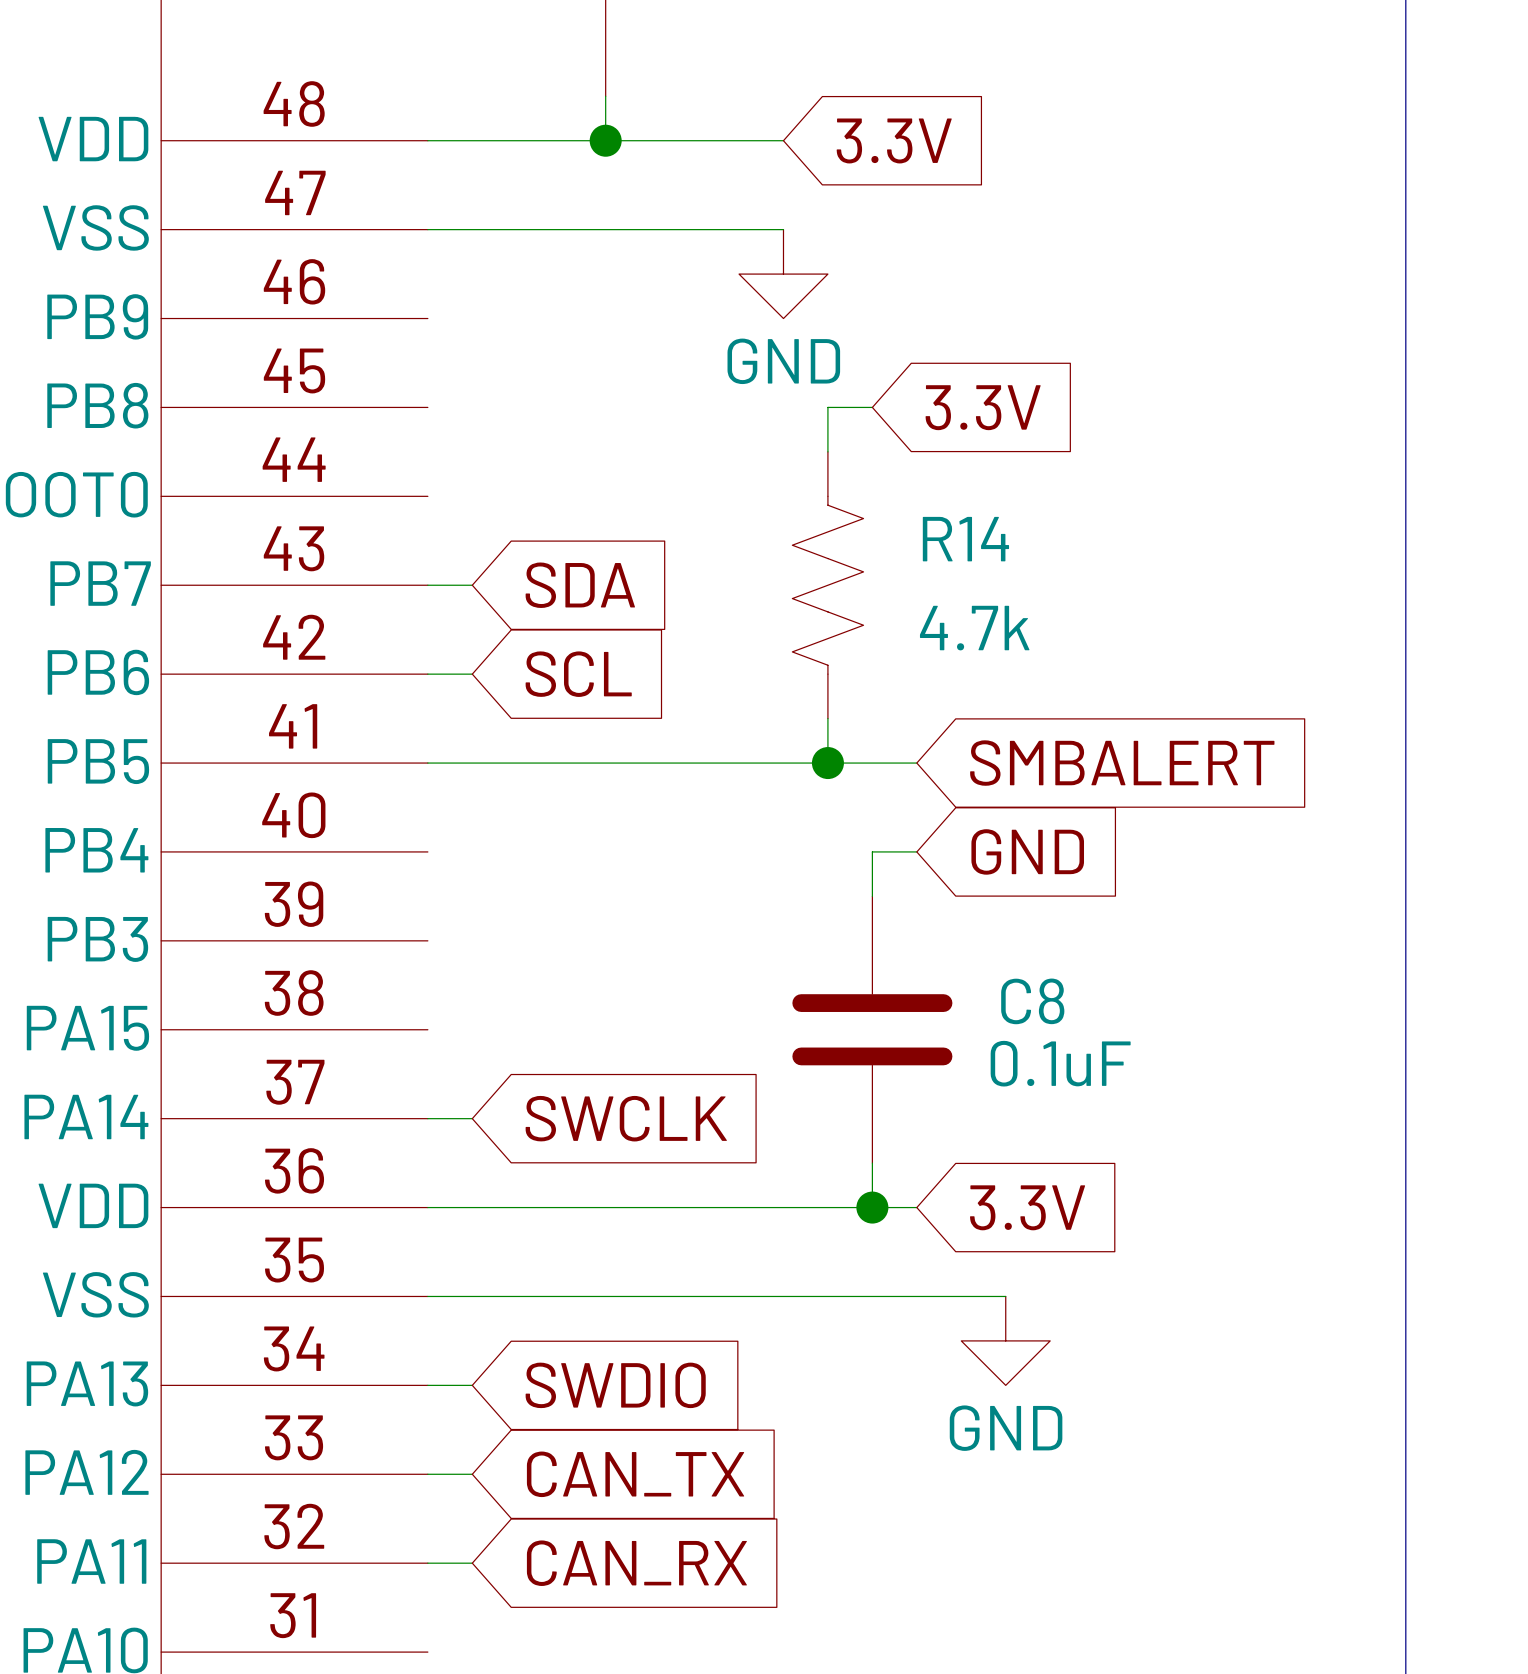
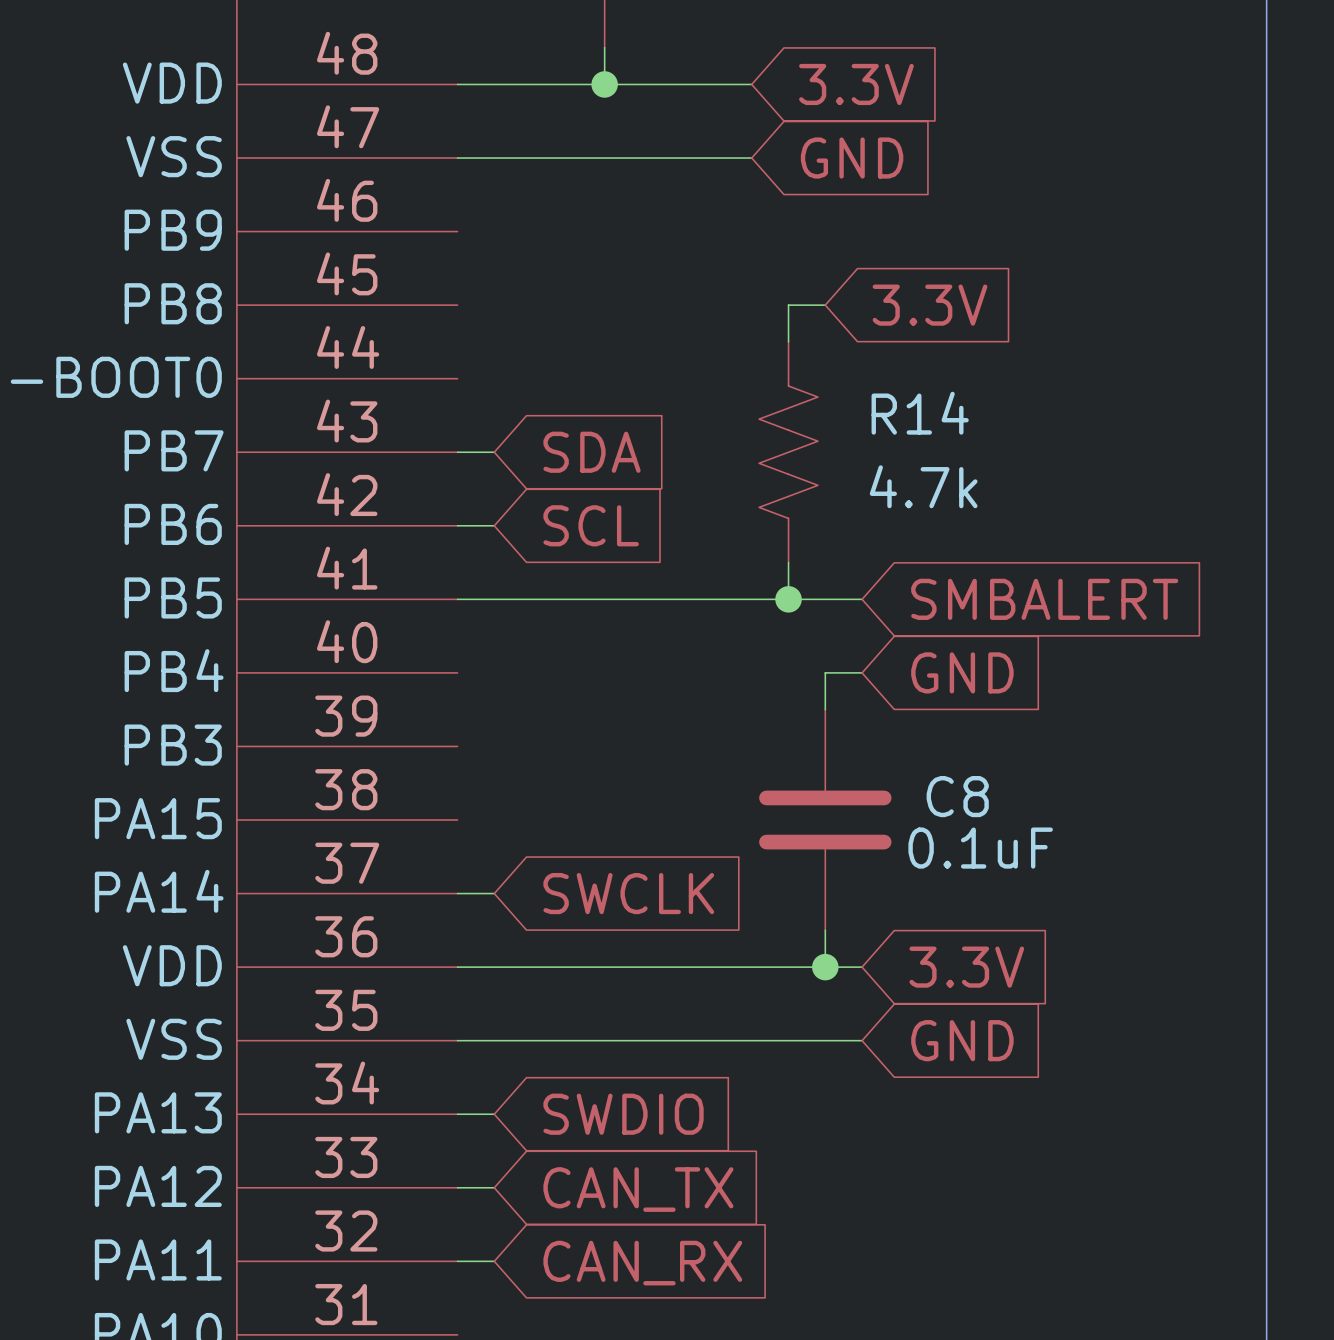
global label: none -> GND (852, 158)
power symbol: GND (783, 274) -> none
wire: (916, 1296) (1005, 1296) -> none
global label: none -> GND (962, 1040)
power symbol: GND (1005, 1340) -> none

